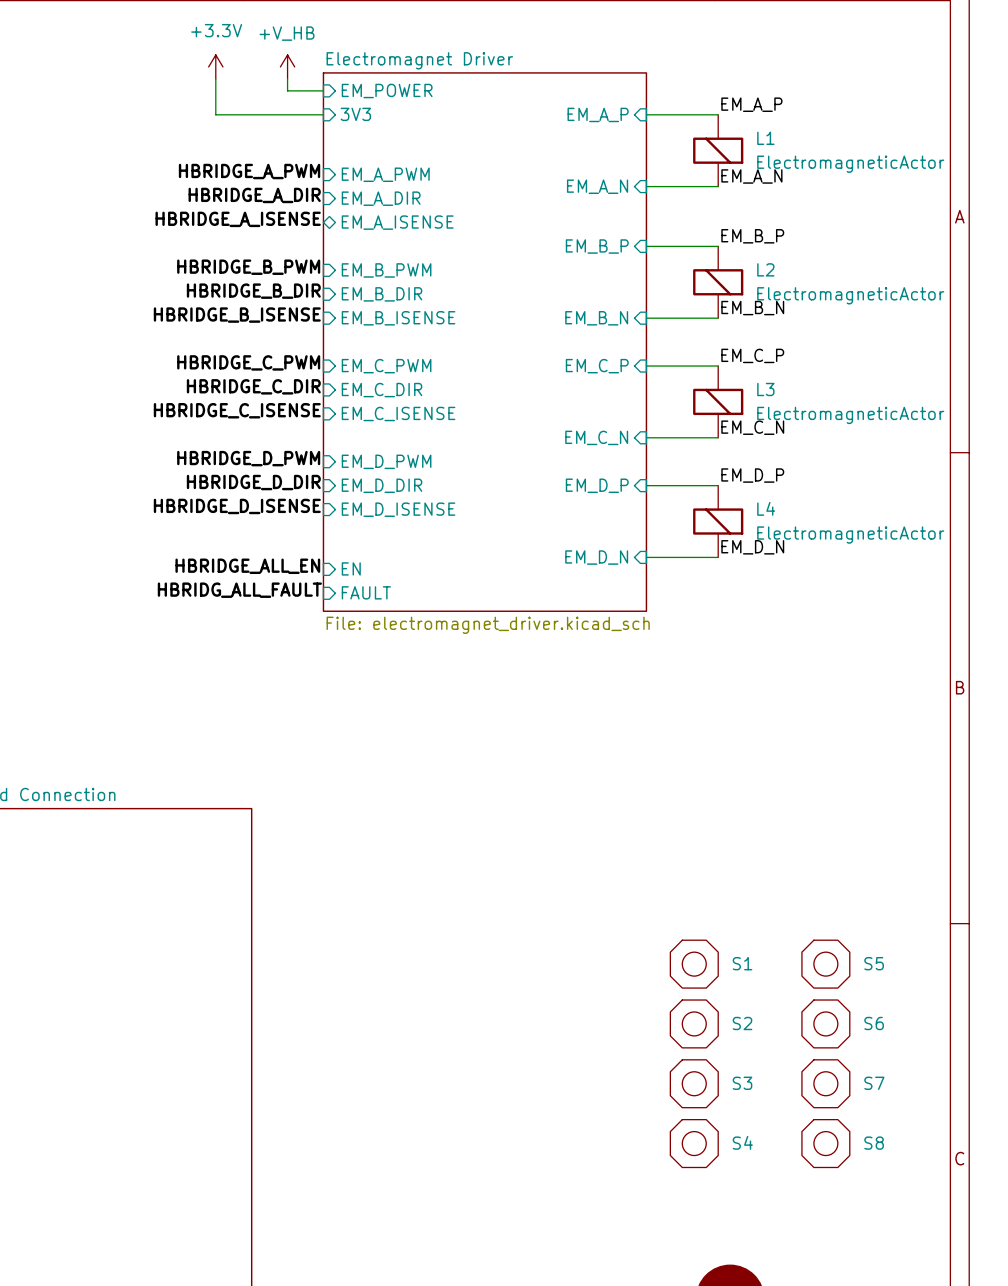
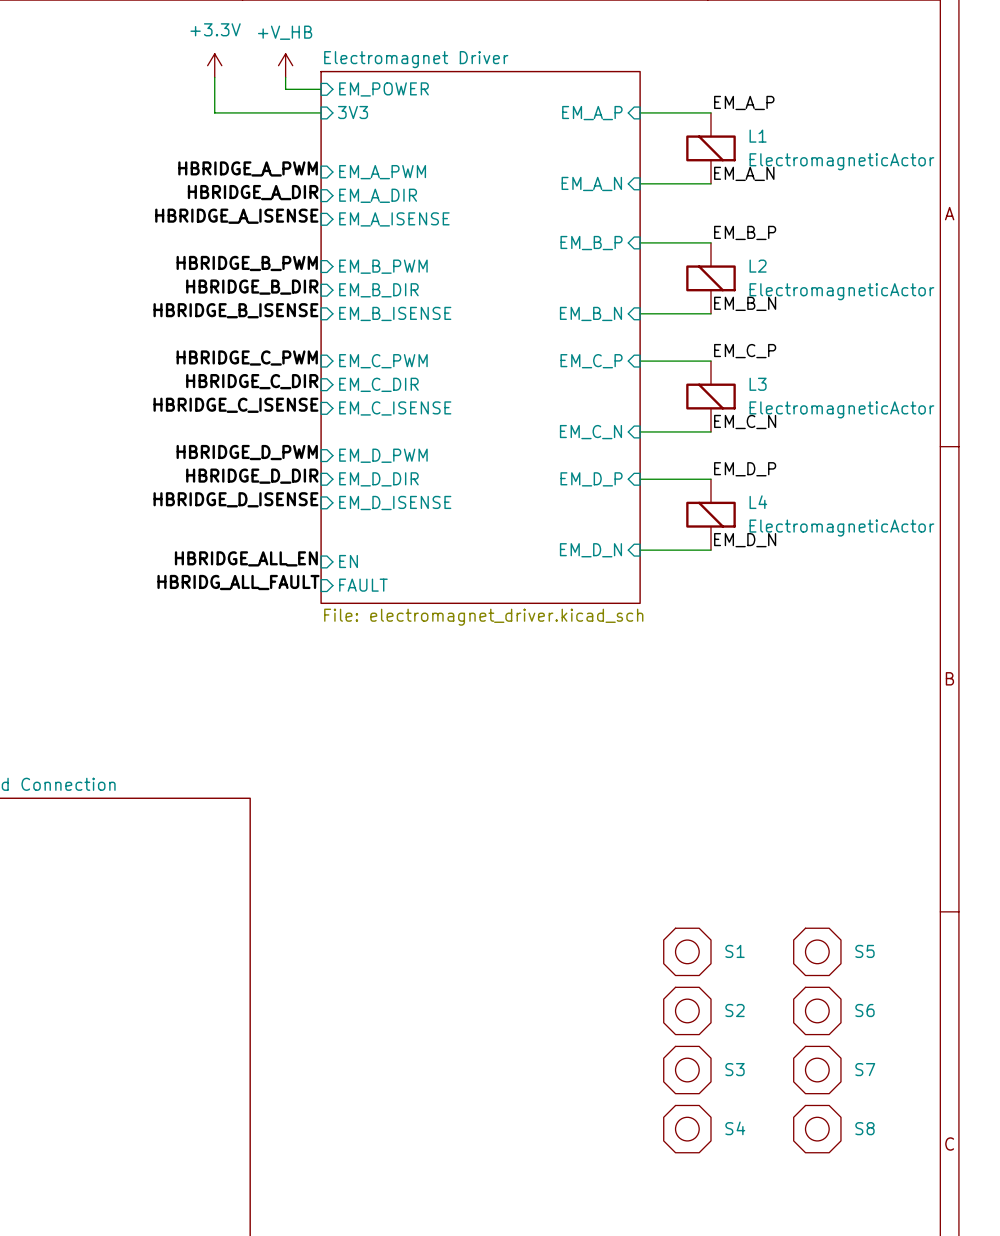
sheet pin shape: bidirectional (397, 222) -> input (394, 219)

